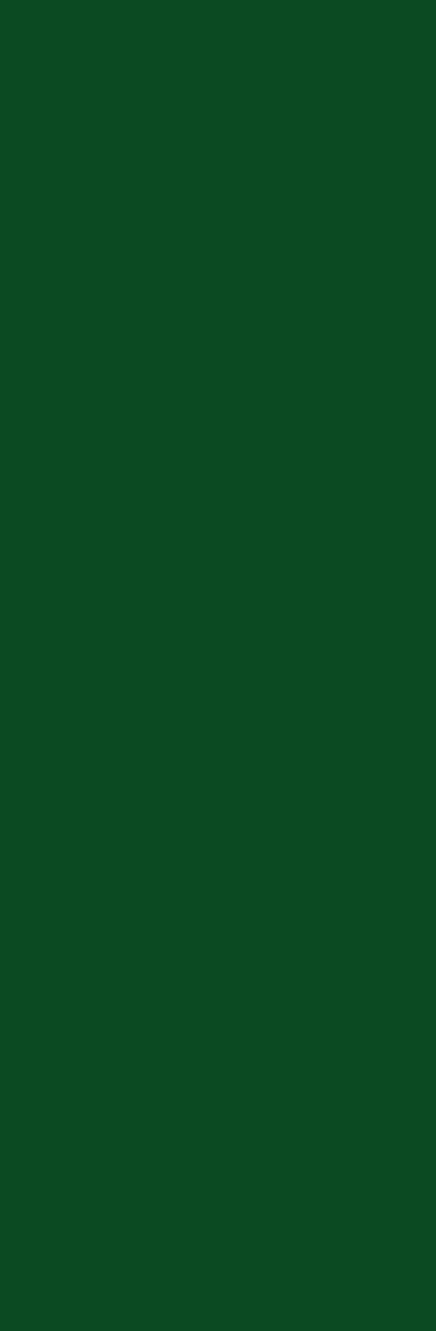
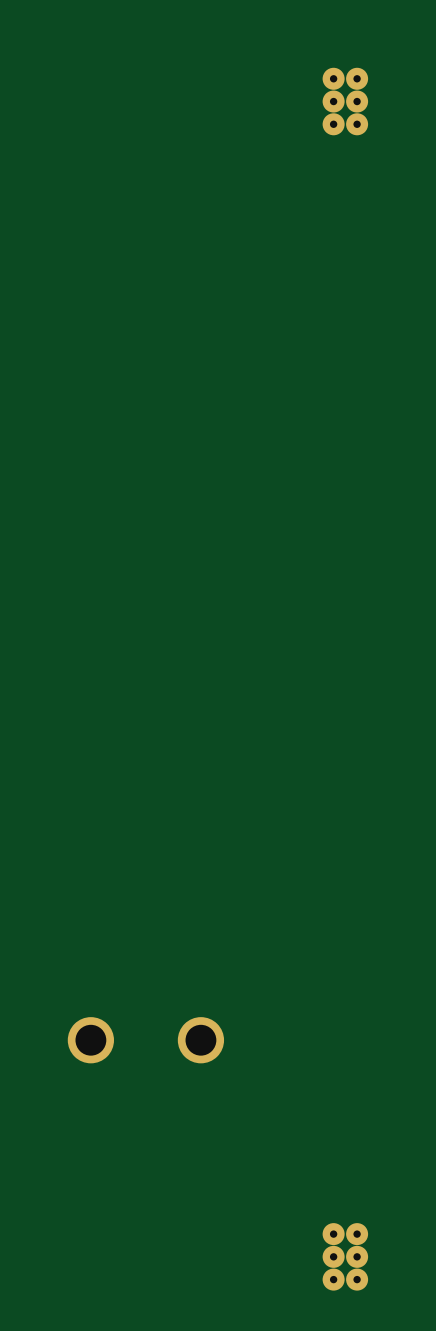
part: none -> (345, 101)
part: none -> (145, 1040)
part: none -> (345, 1256)

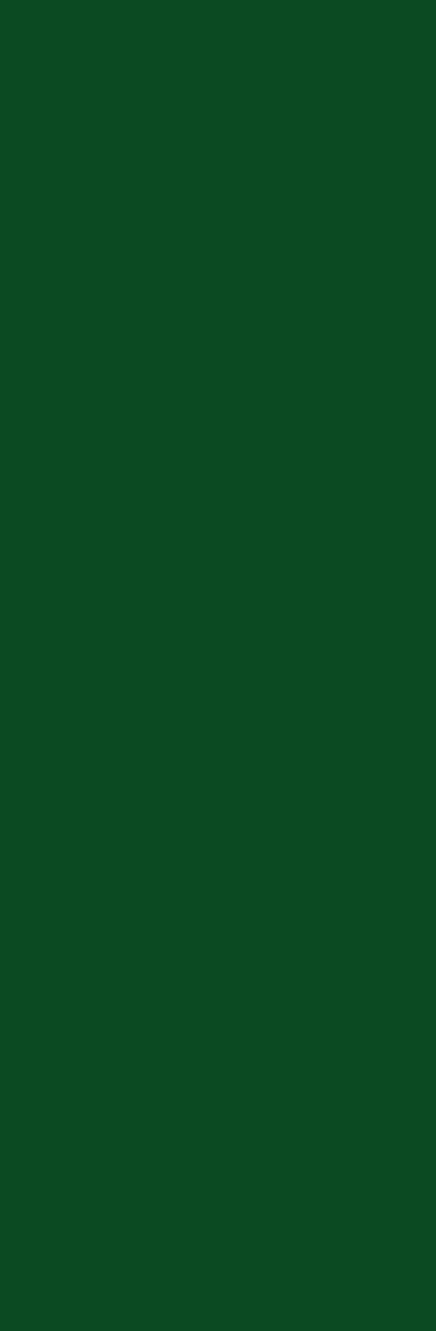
part: (345, 101) -> none
part: (145, 1040) -> none
part: (345, 1256) -> none

